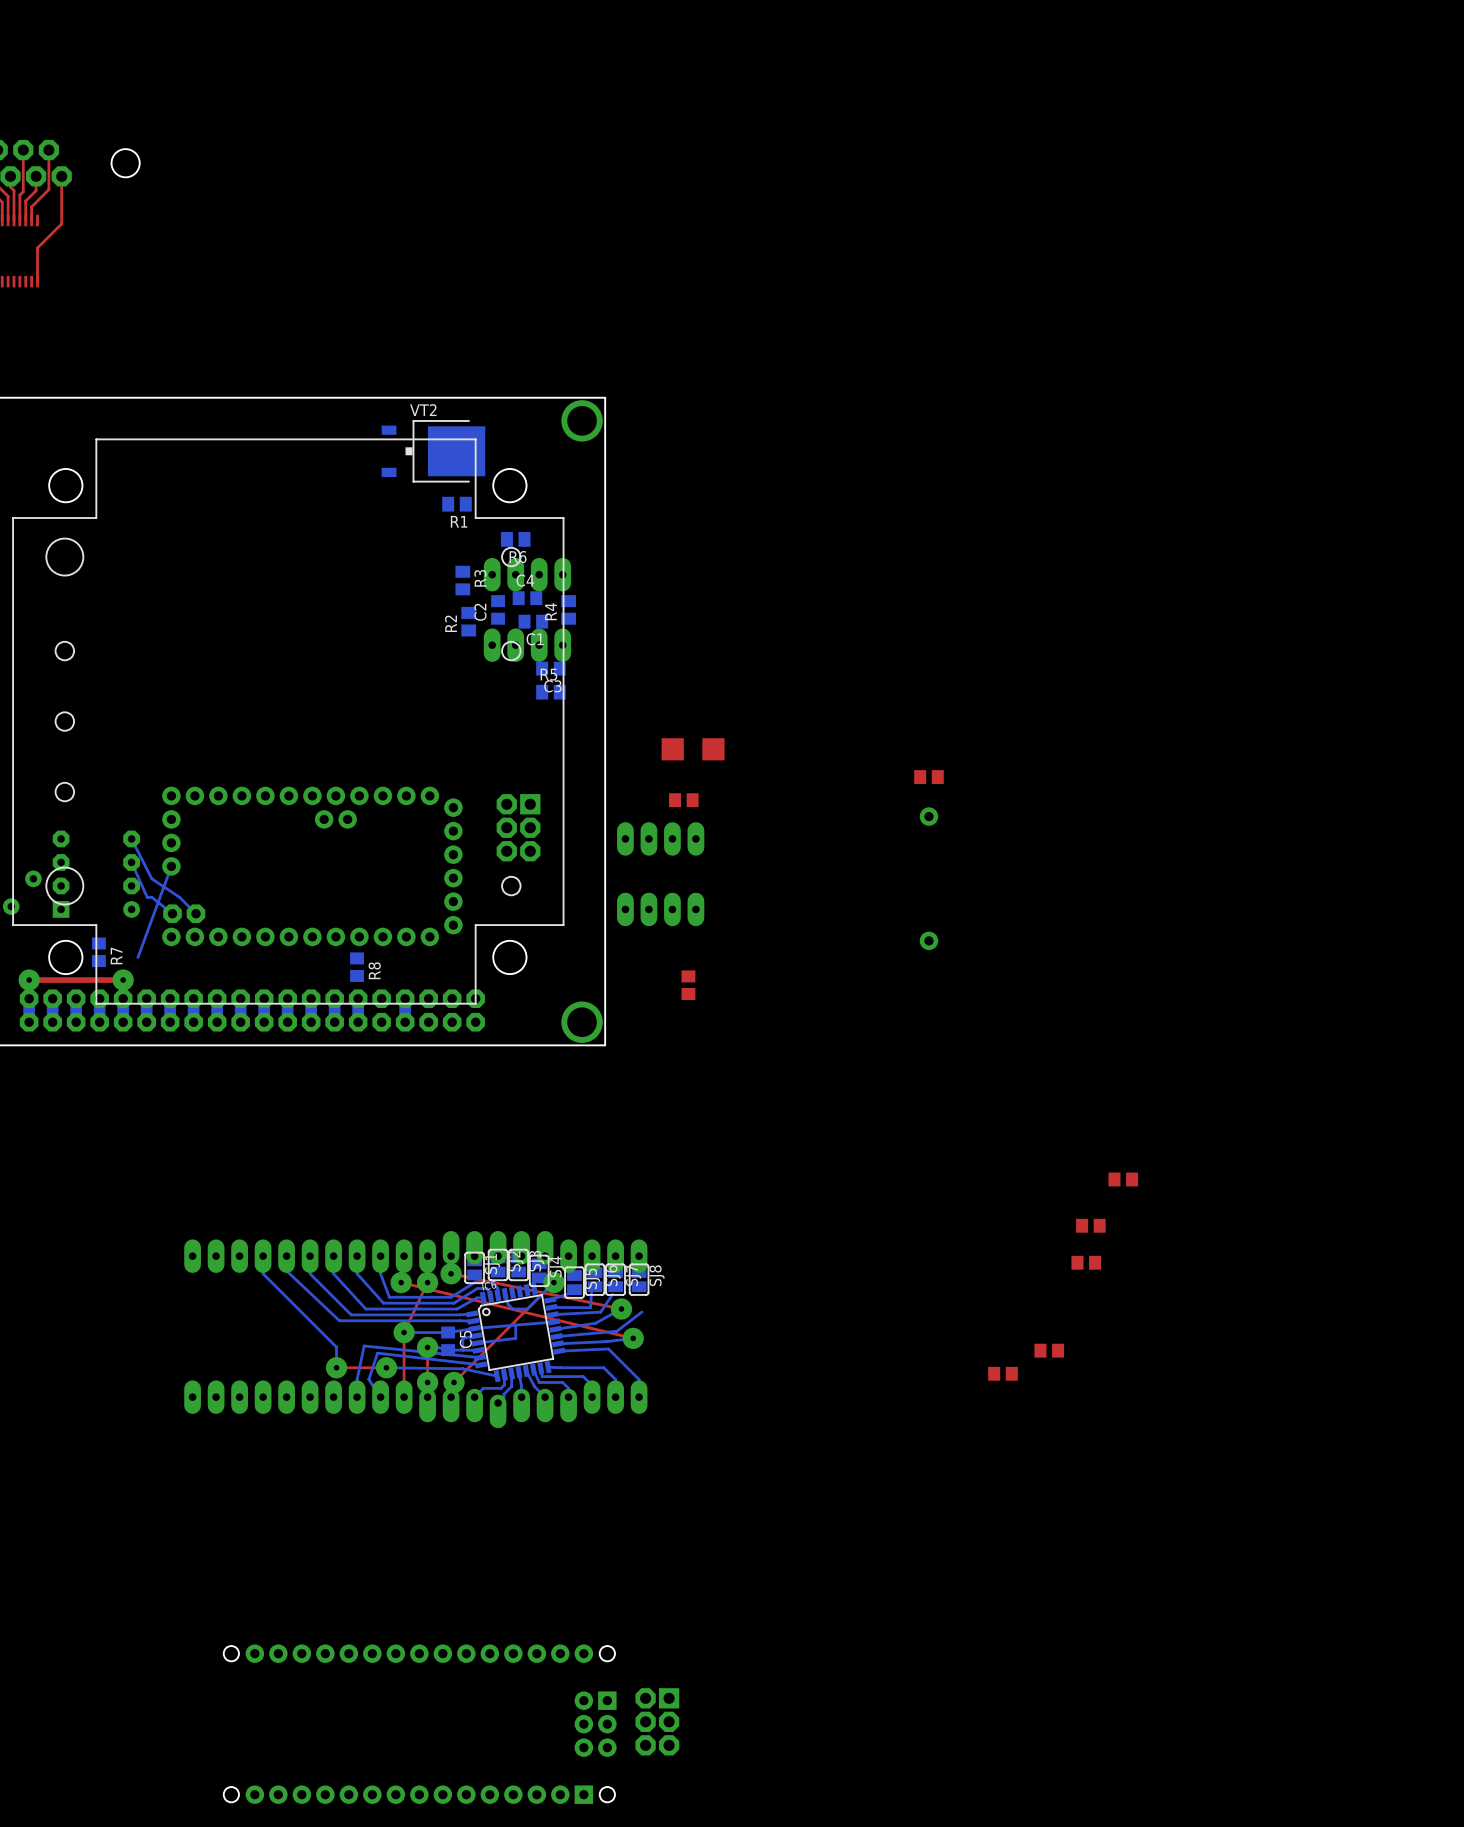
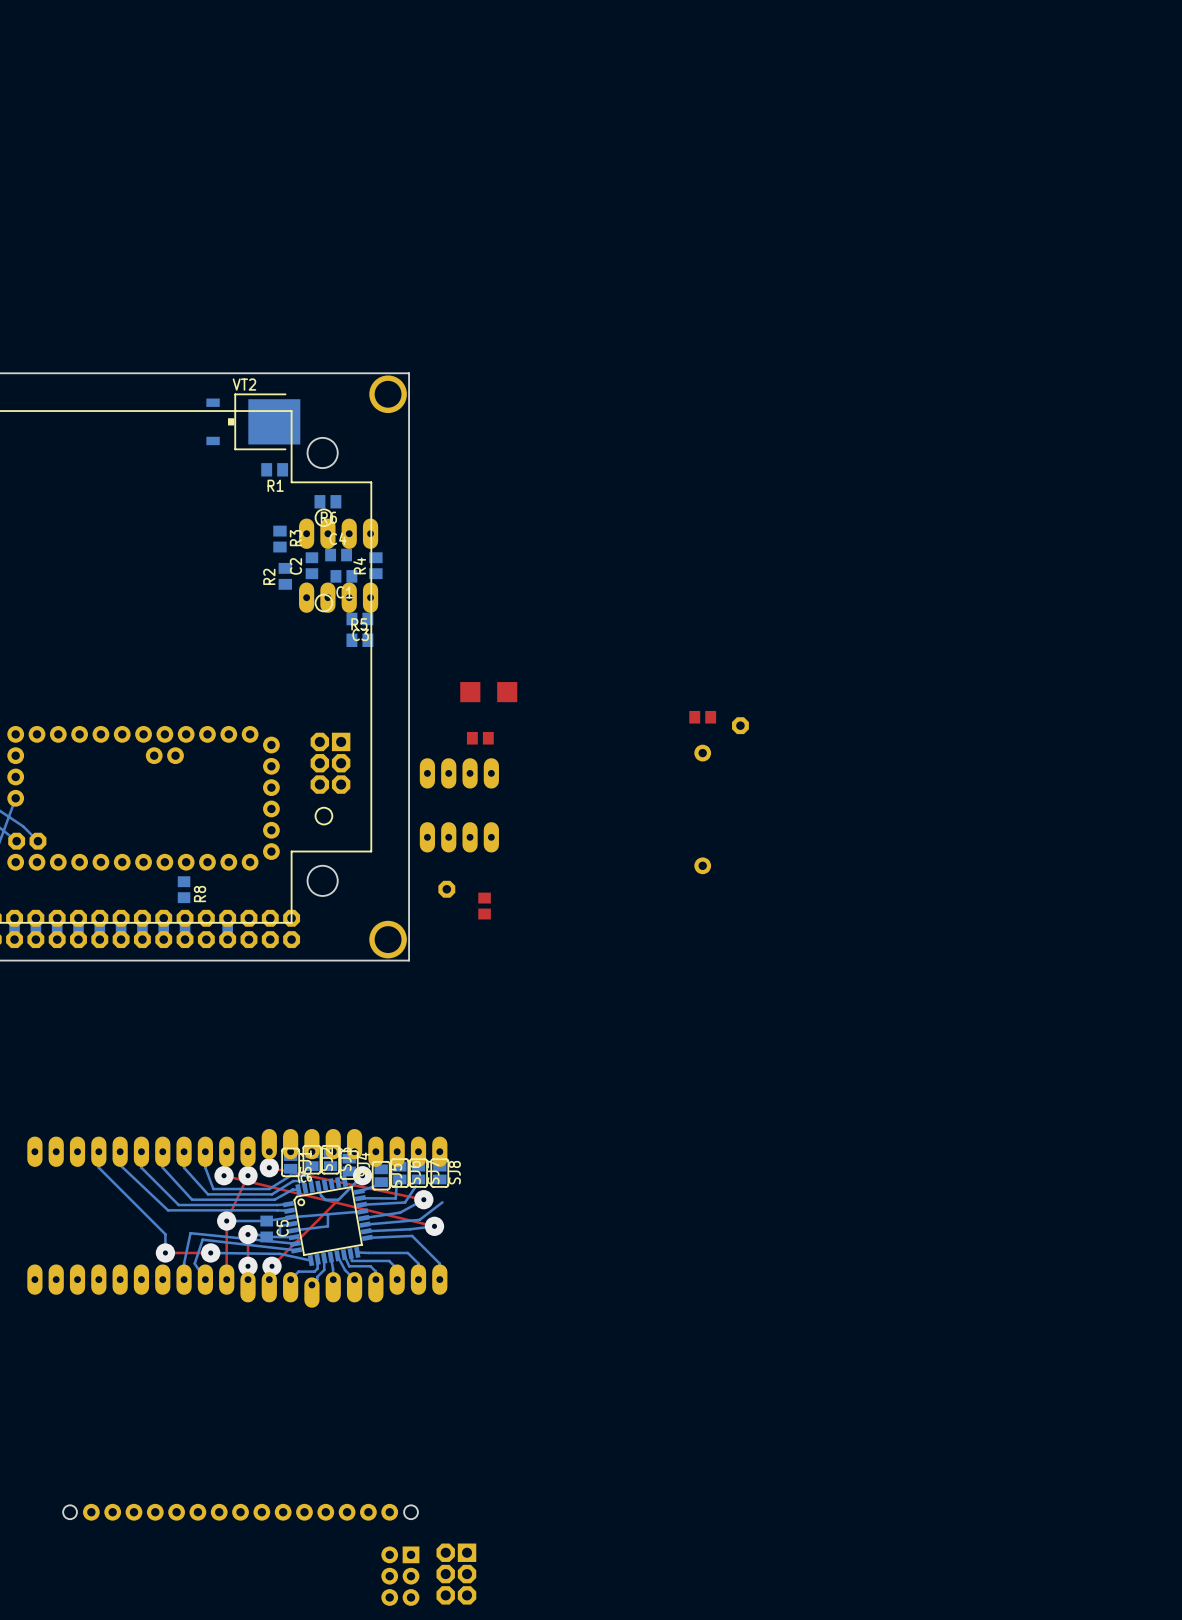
part: none -> (740, 725)
part: none -> (446, 889)
part: (1123, 1179) -> none
part: (1090, 1225) -> none
part: (1086, 1262) -> none
part: (1049, 1350) -> none
part: (1003, 1373) -> none

